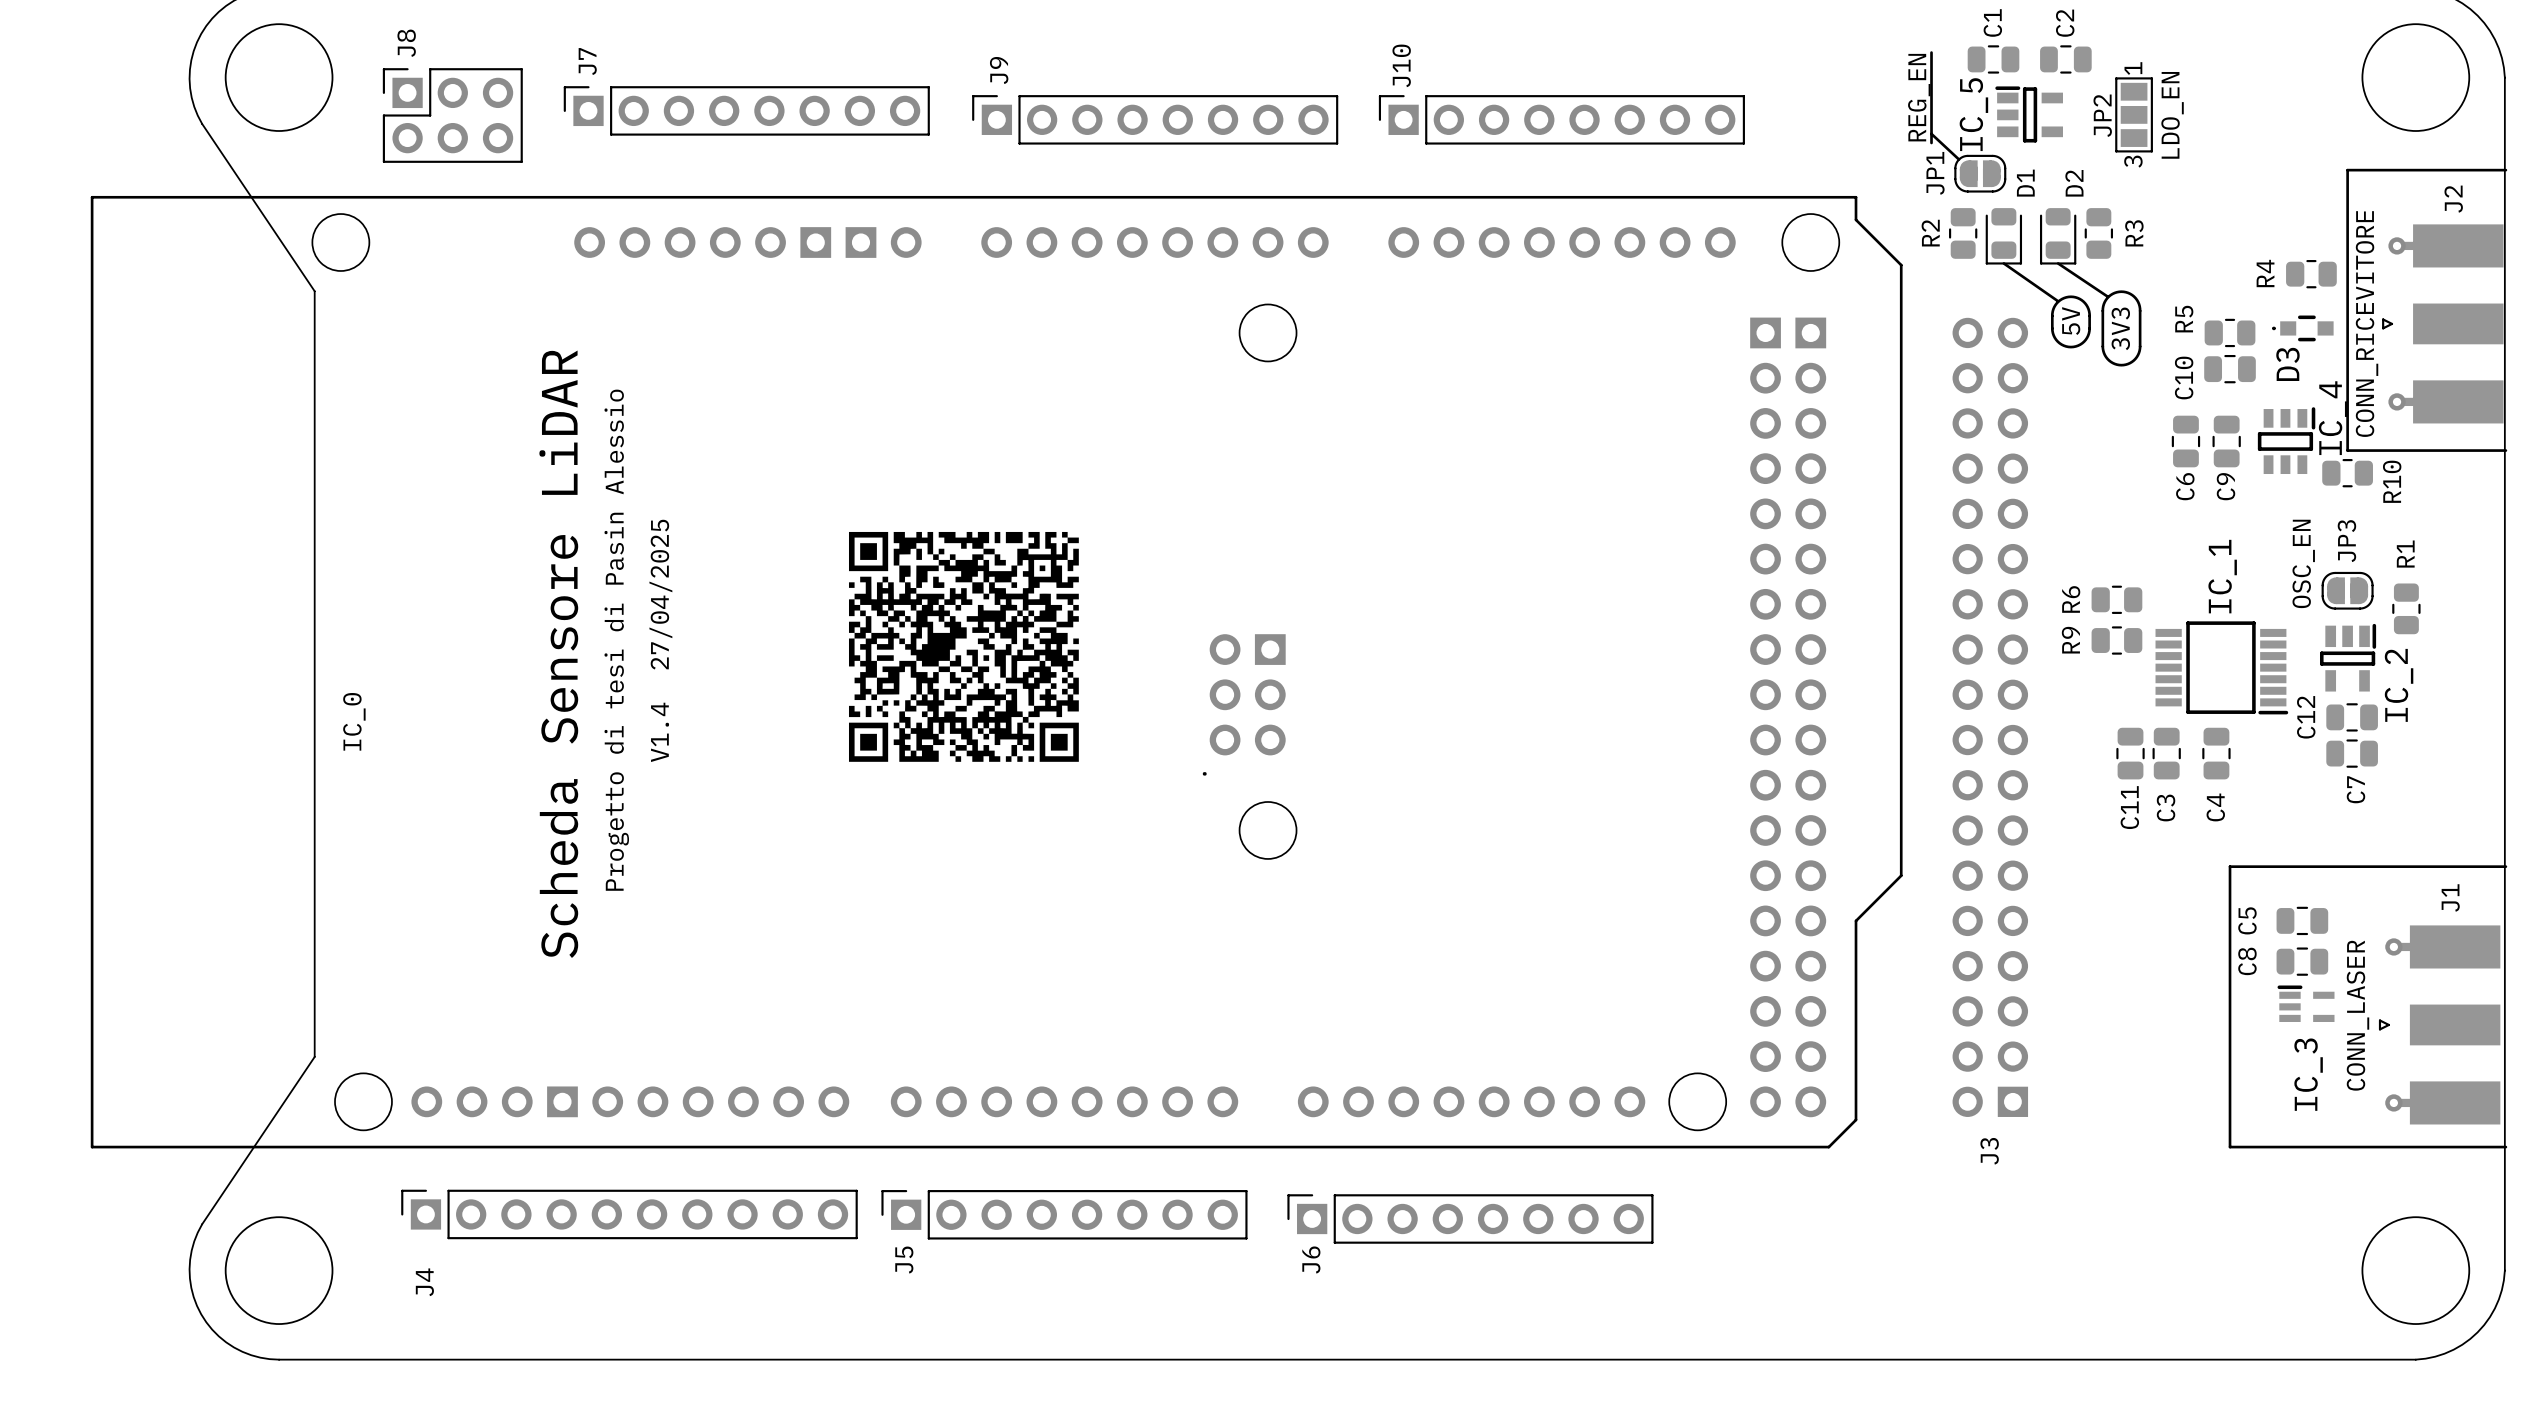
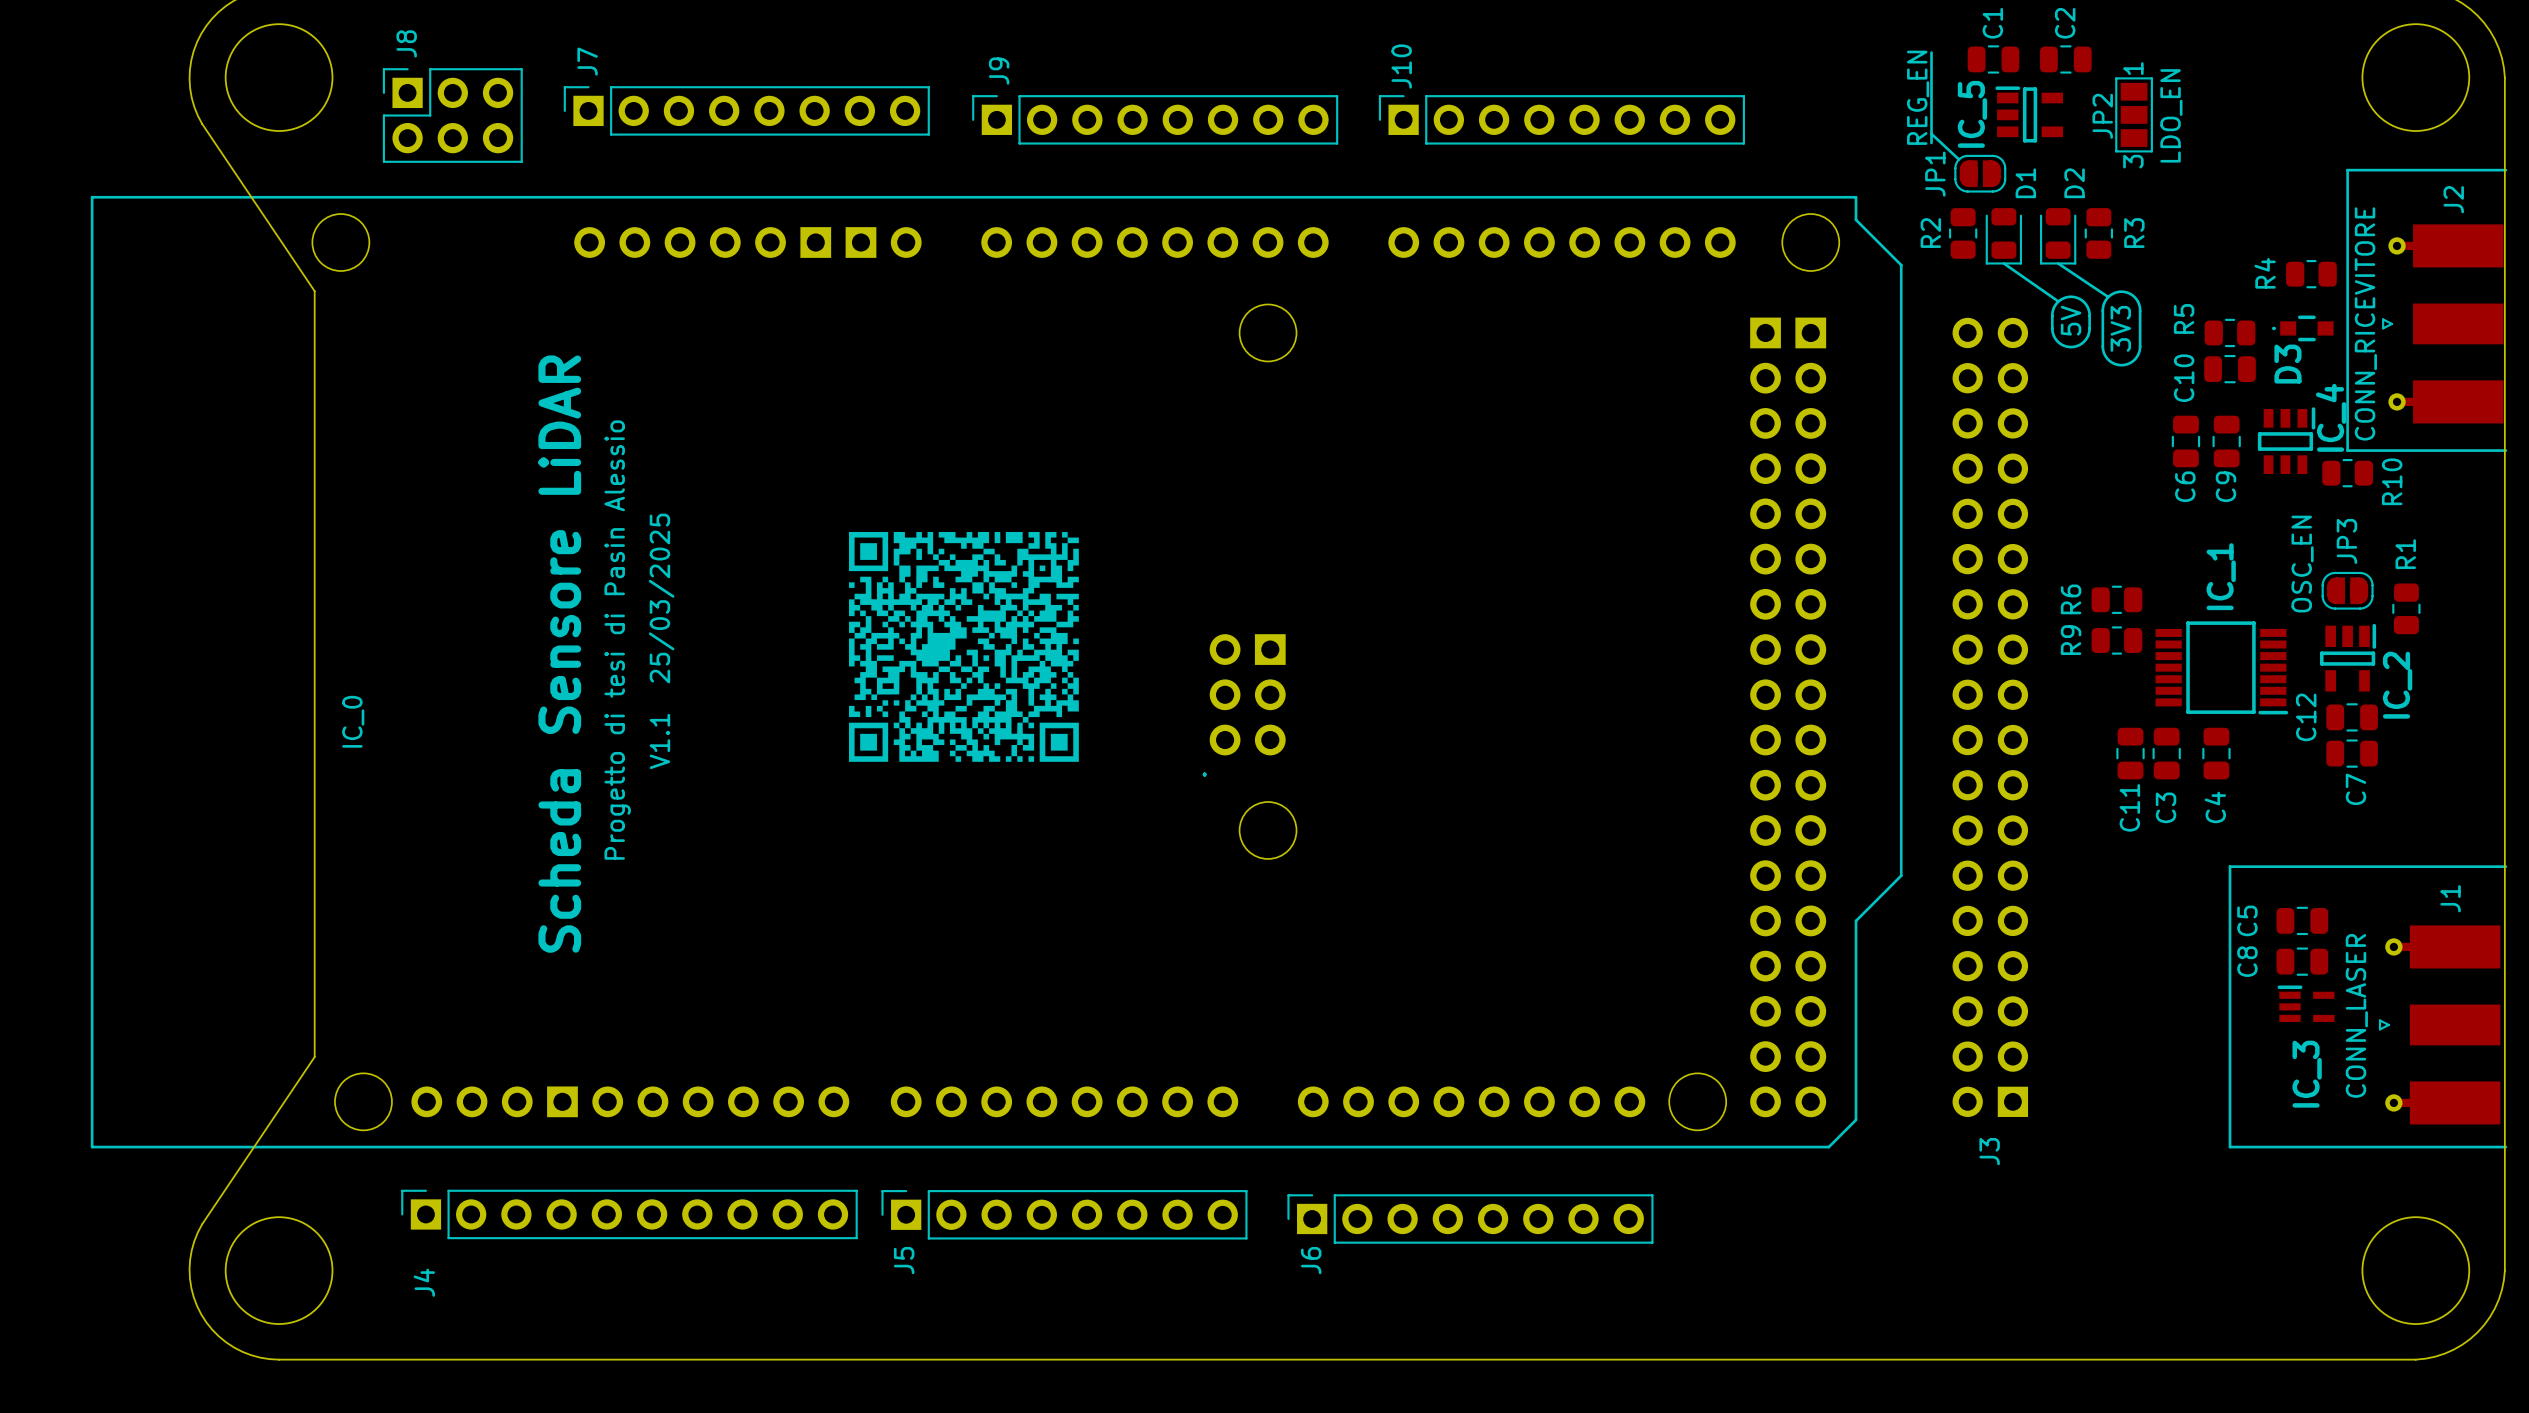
text: V1.4 27/04/2025 (660, 640) -> V1.1 25/03/2025 (661, 641)

